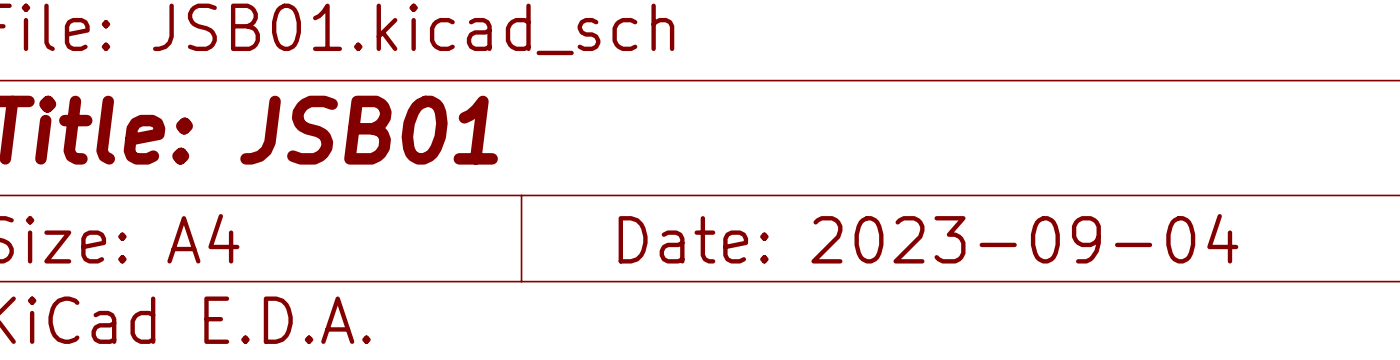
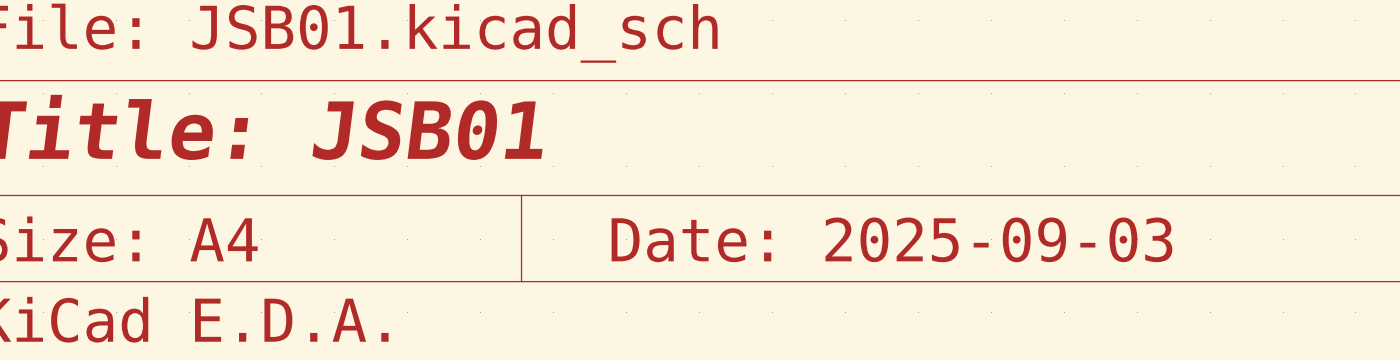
title block: Date: 2023-09-04 (928, 238) -> Date: 2025-09-03 (891, 239)

